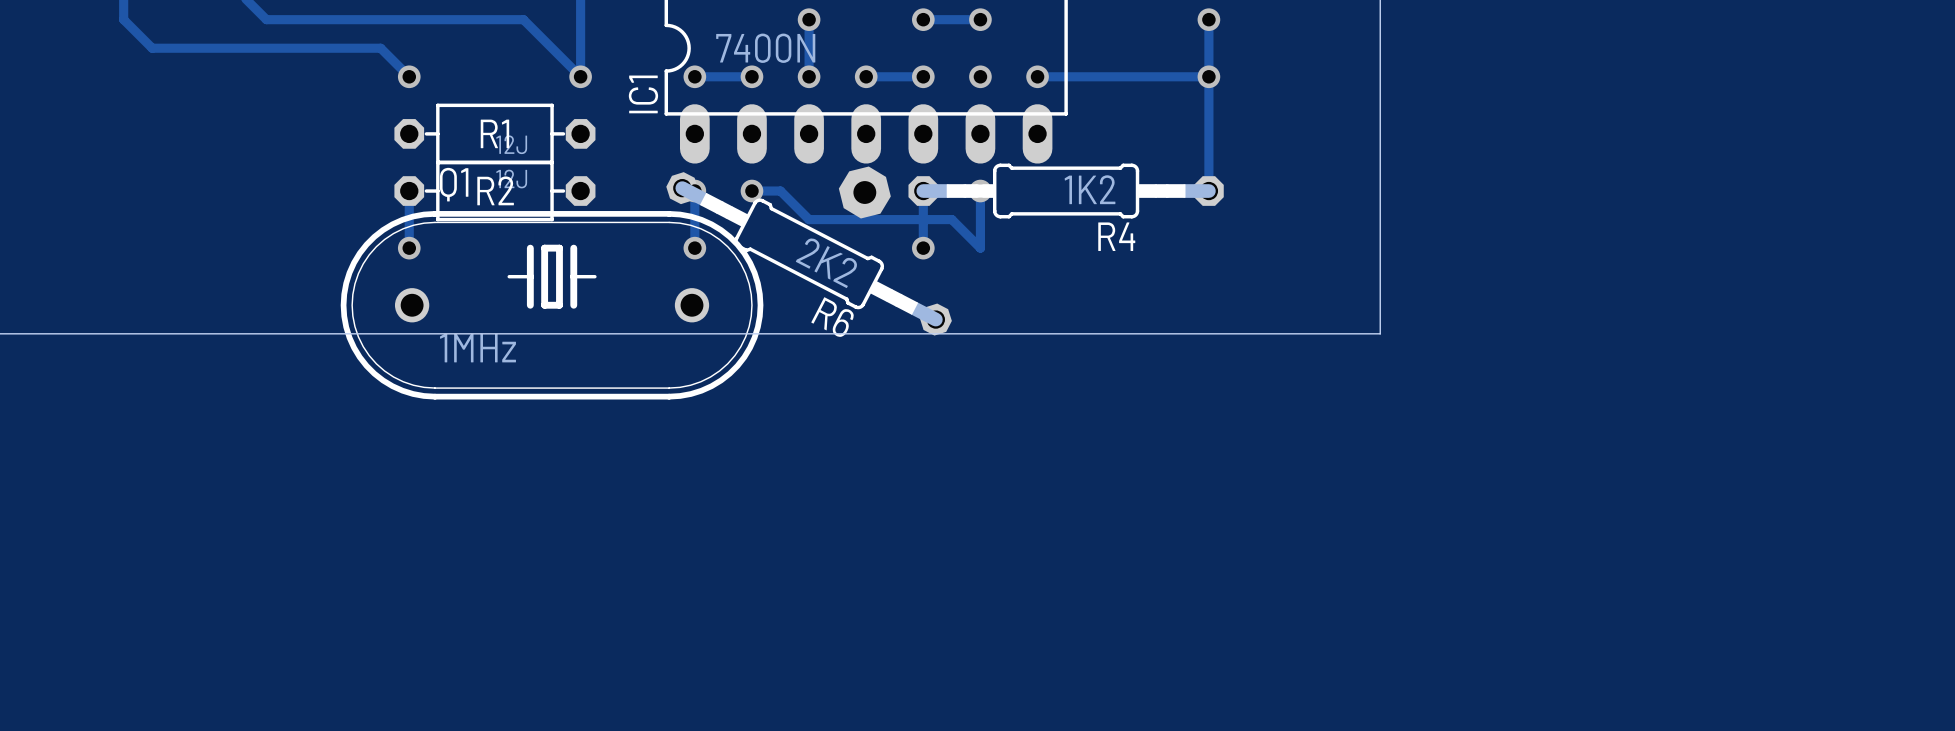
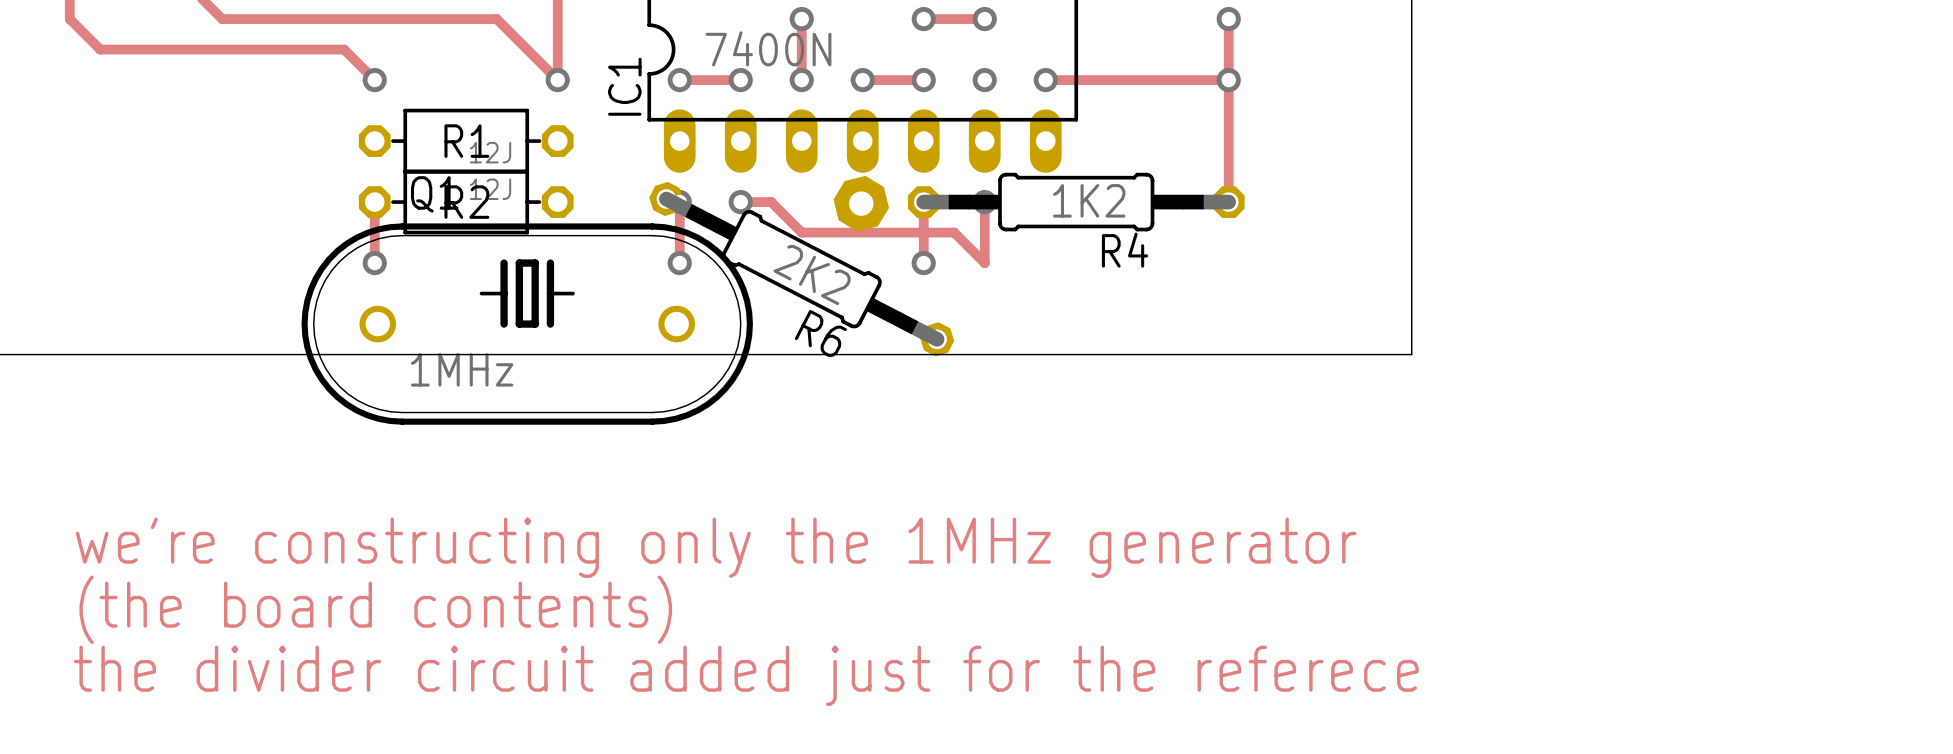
text: none -> we're constructing only the 1MHz generator (716, 547)
text: none -> (the board contents) (375, 609)
text: none -> the divider circuit added just for the referece (746, 675)

